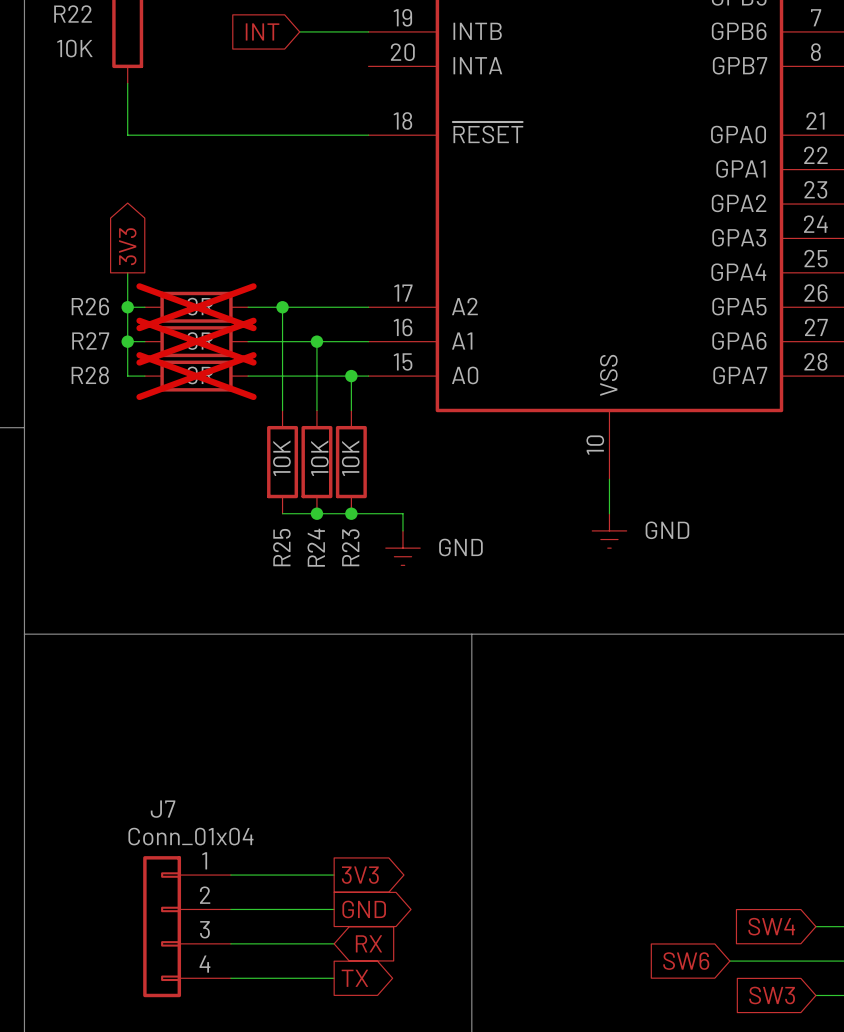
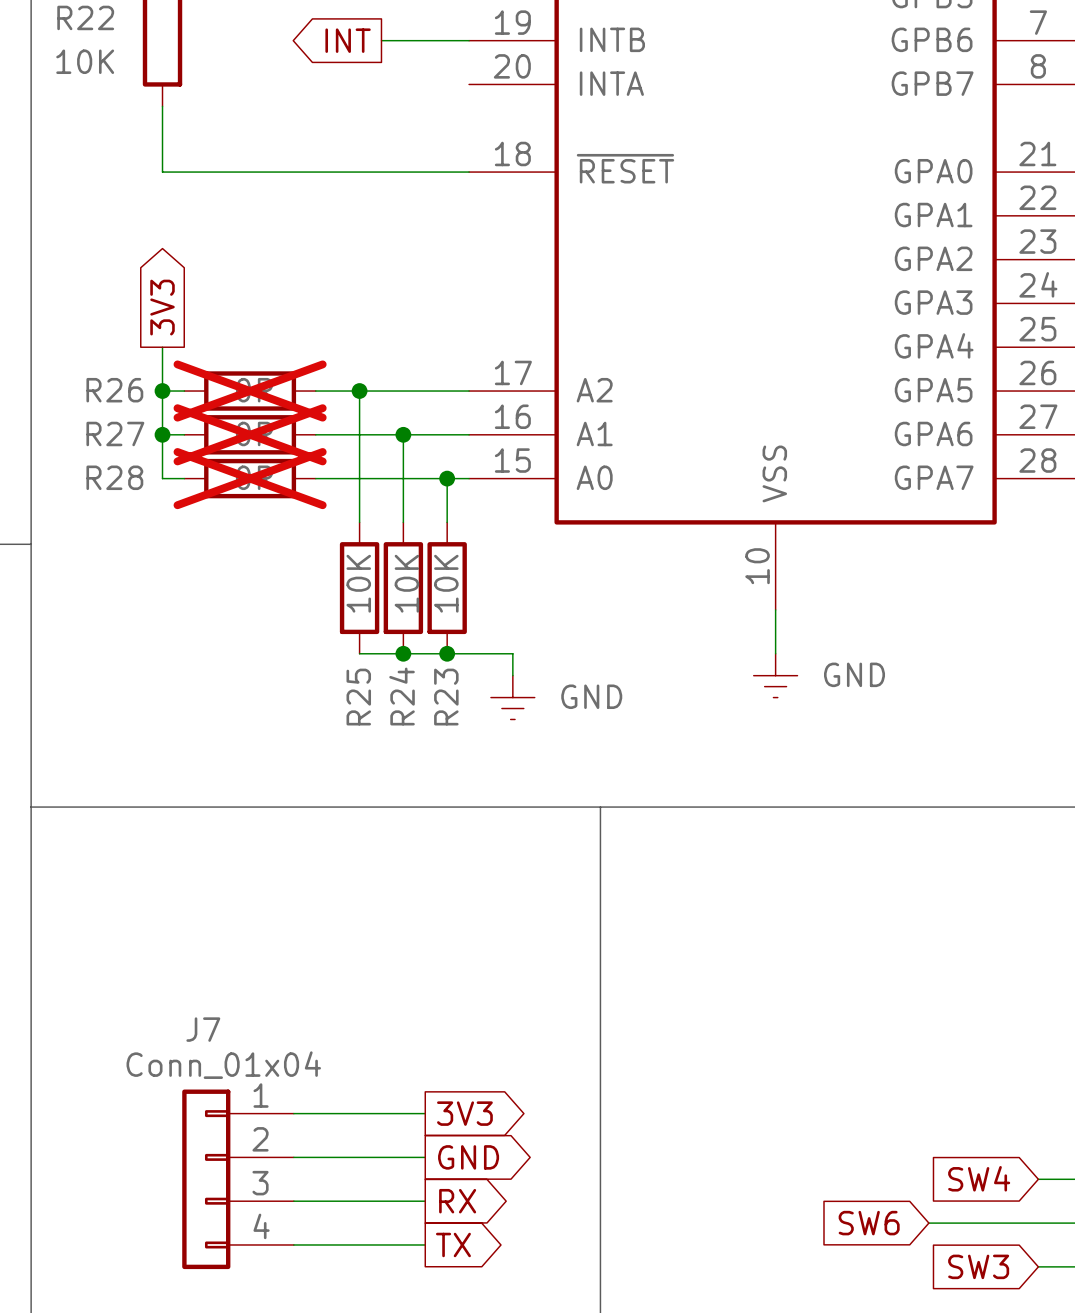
global label shape: input (262, 31) -> output (348, 40)
global label shape: input (368, 943) -> output (457, 1201)

